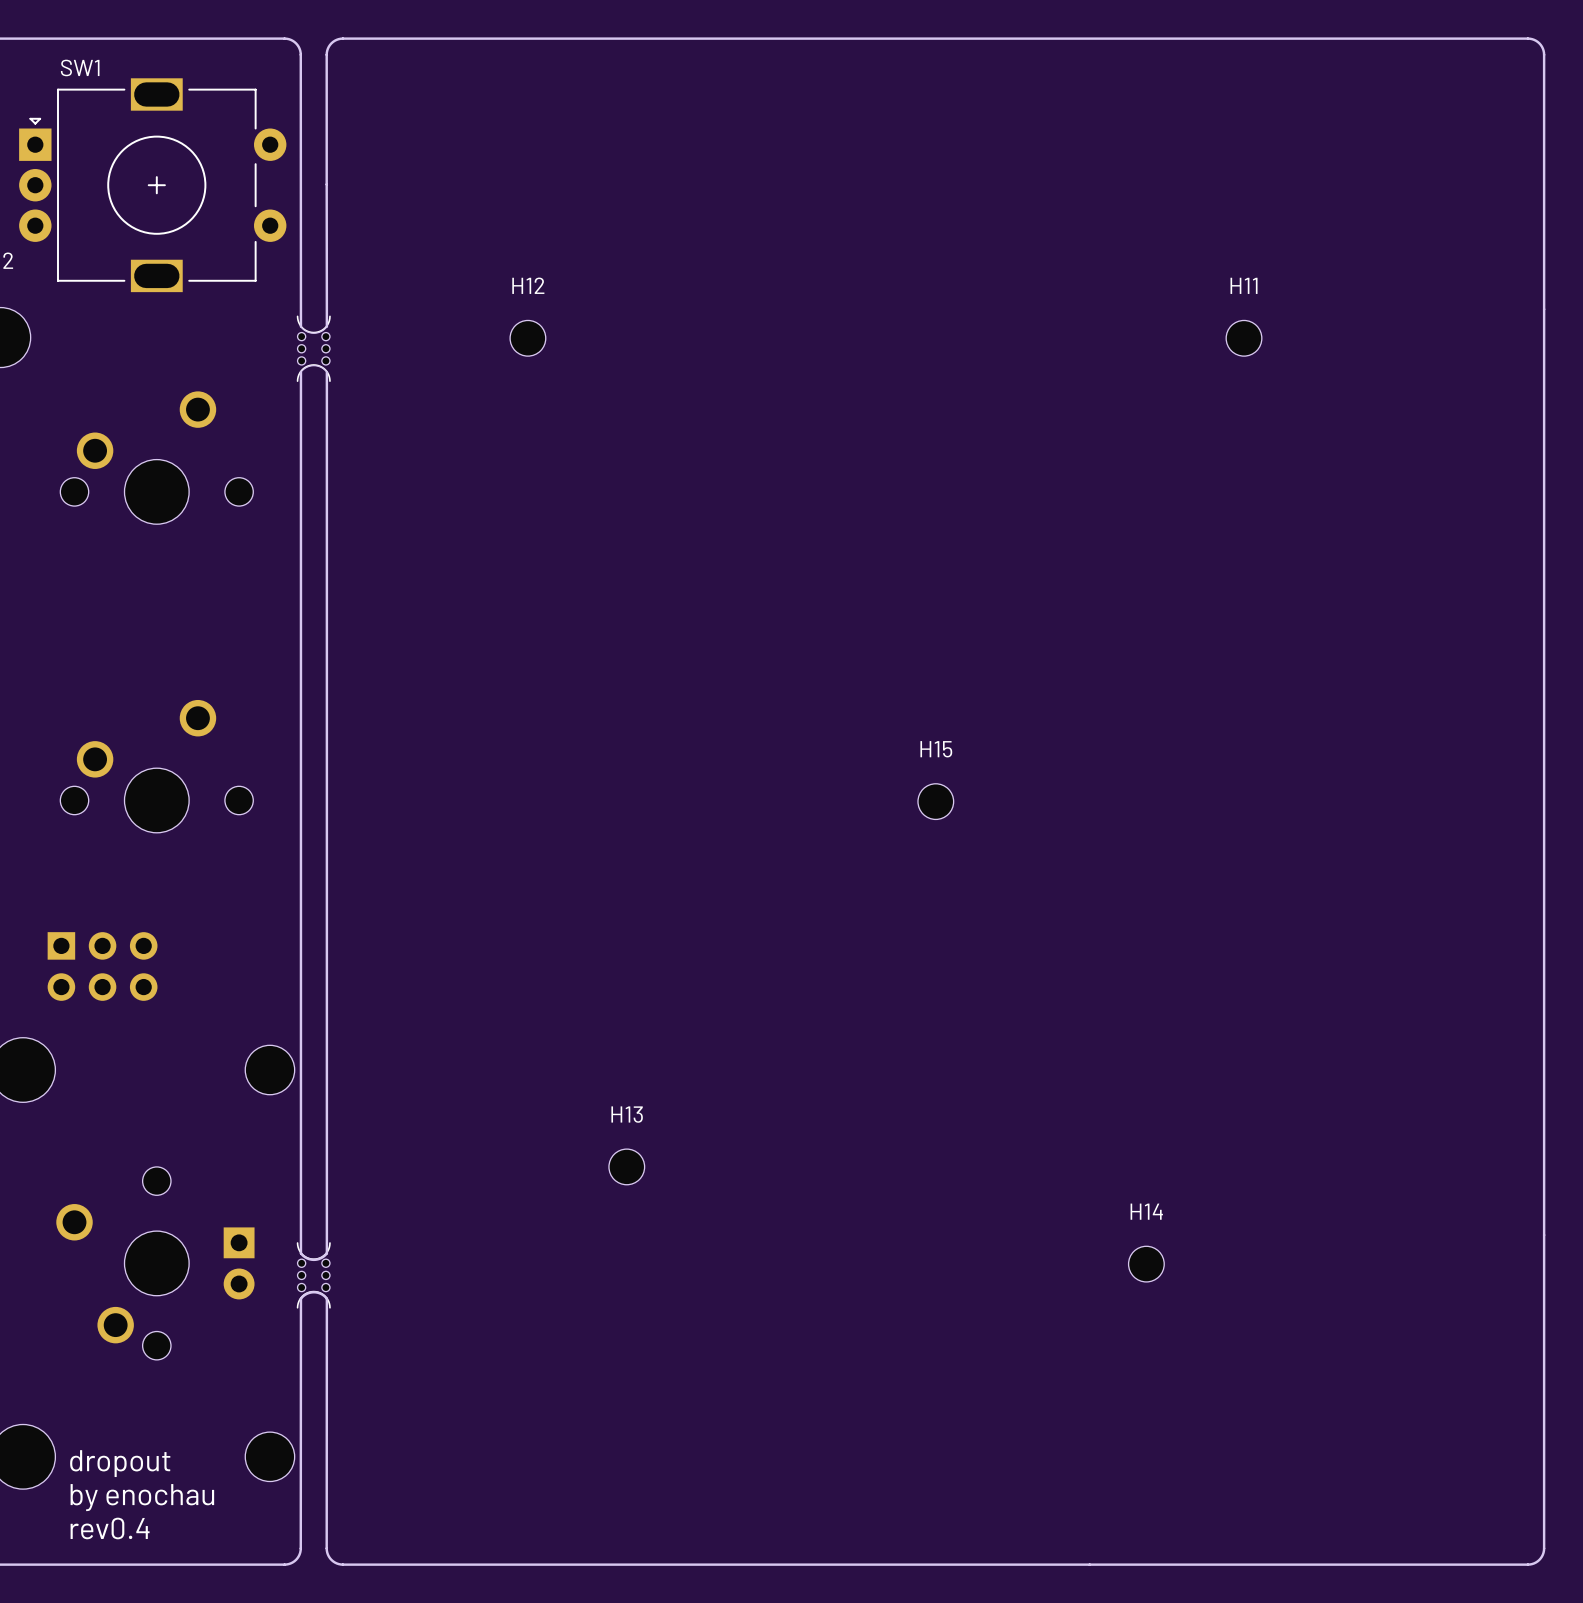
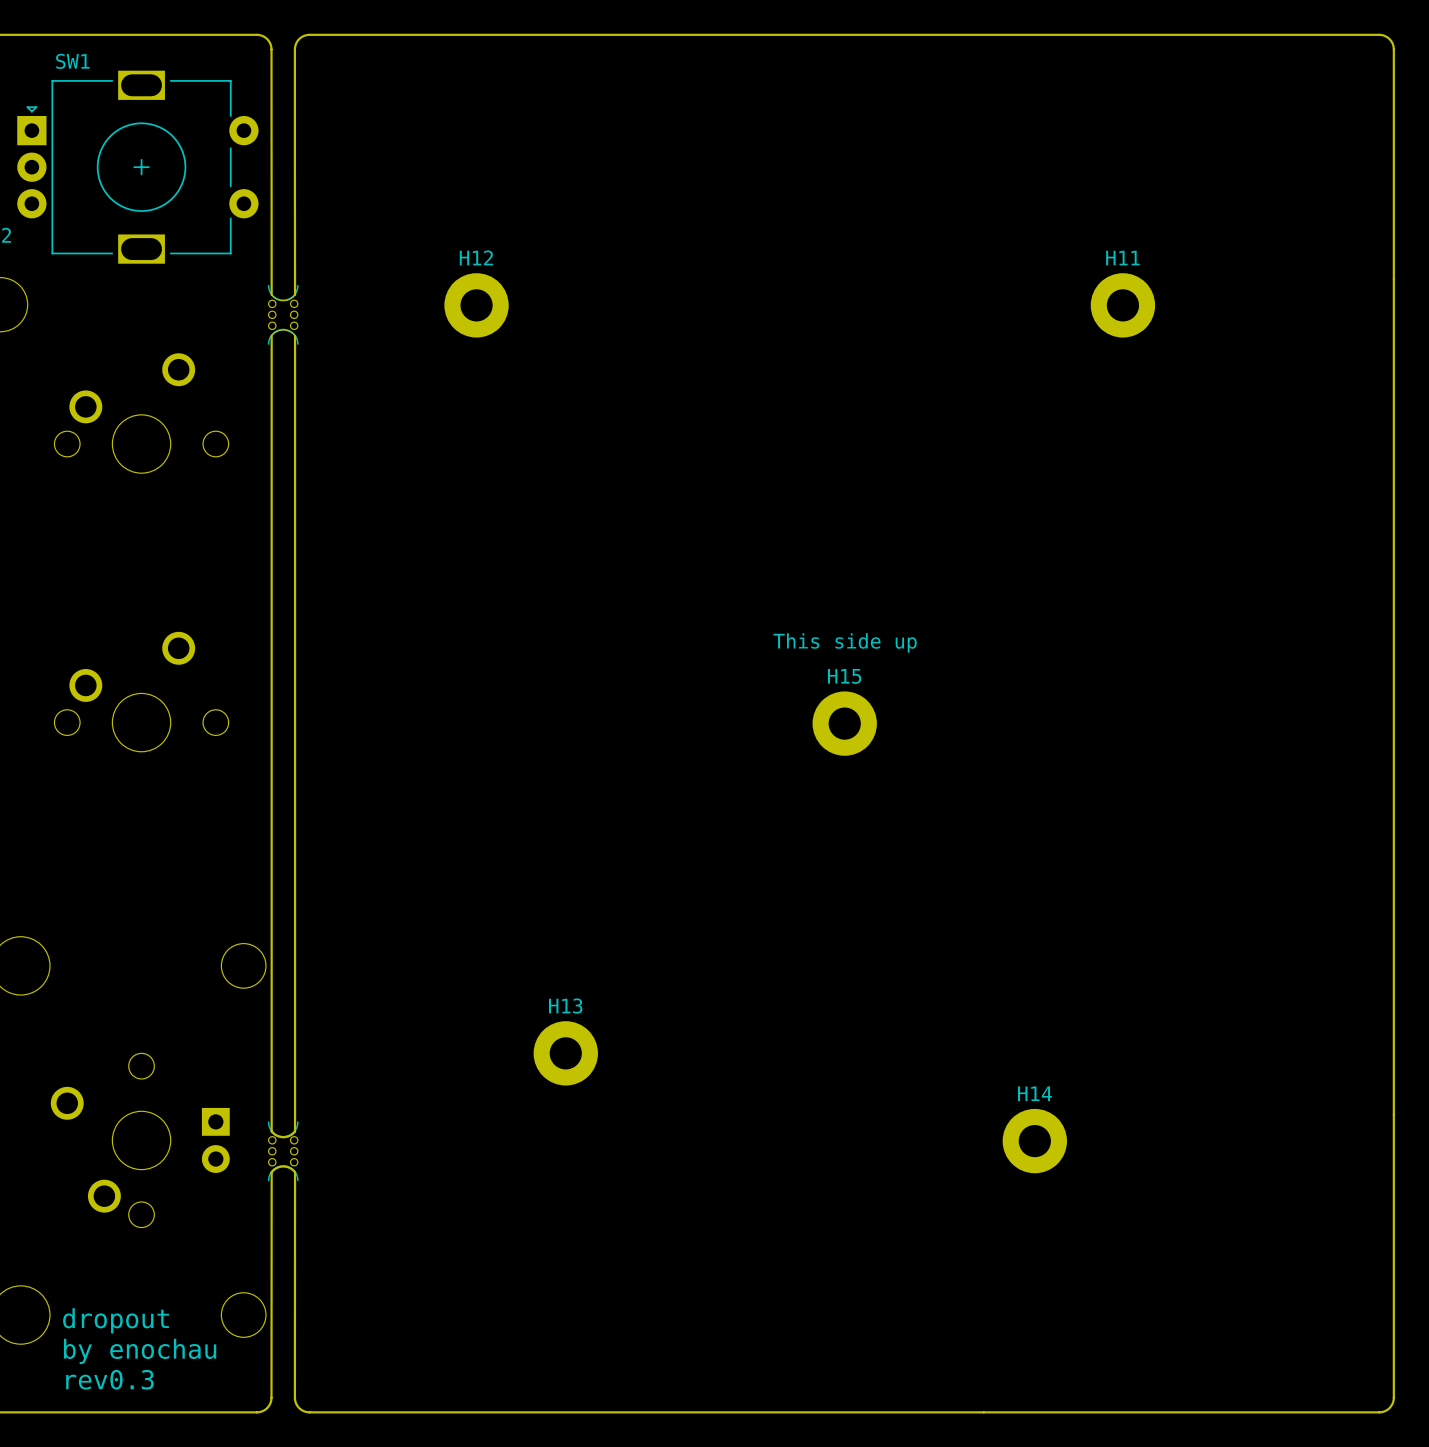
H12 footprint: [510, 320, 546, 357] -> [444, 273, 509, 338]
H11 footprint: [1226, 320, 1262, 357] -> [1090, 273, 1156, 338]
text: none -> This side up (845, 642)
H15 footprint: [917, 783, 954, 820] -> [812, 691, 877, 756]
part: (102, 966) -> none
H13 footprint: [608, 1149, 645, 1185] -> [533, 1021, 598, 1086]
H14 footprint: [1128, 1246, 1165, 1282] -> [1002, 1108, 1067, 1174]
text: rev0.4 (110, 1528) -> rev0.3 (109, 1379)

